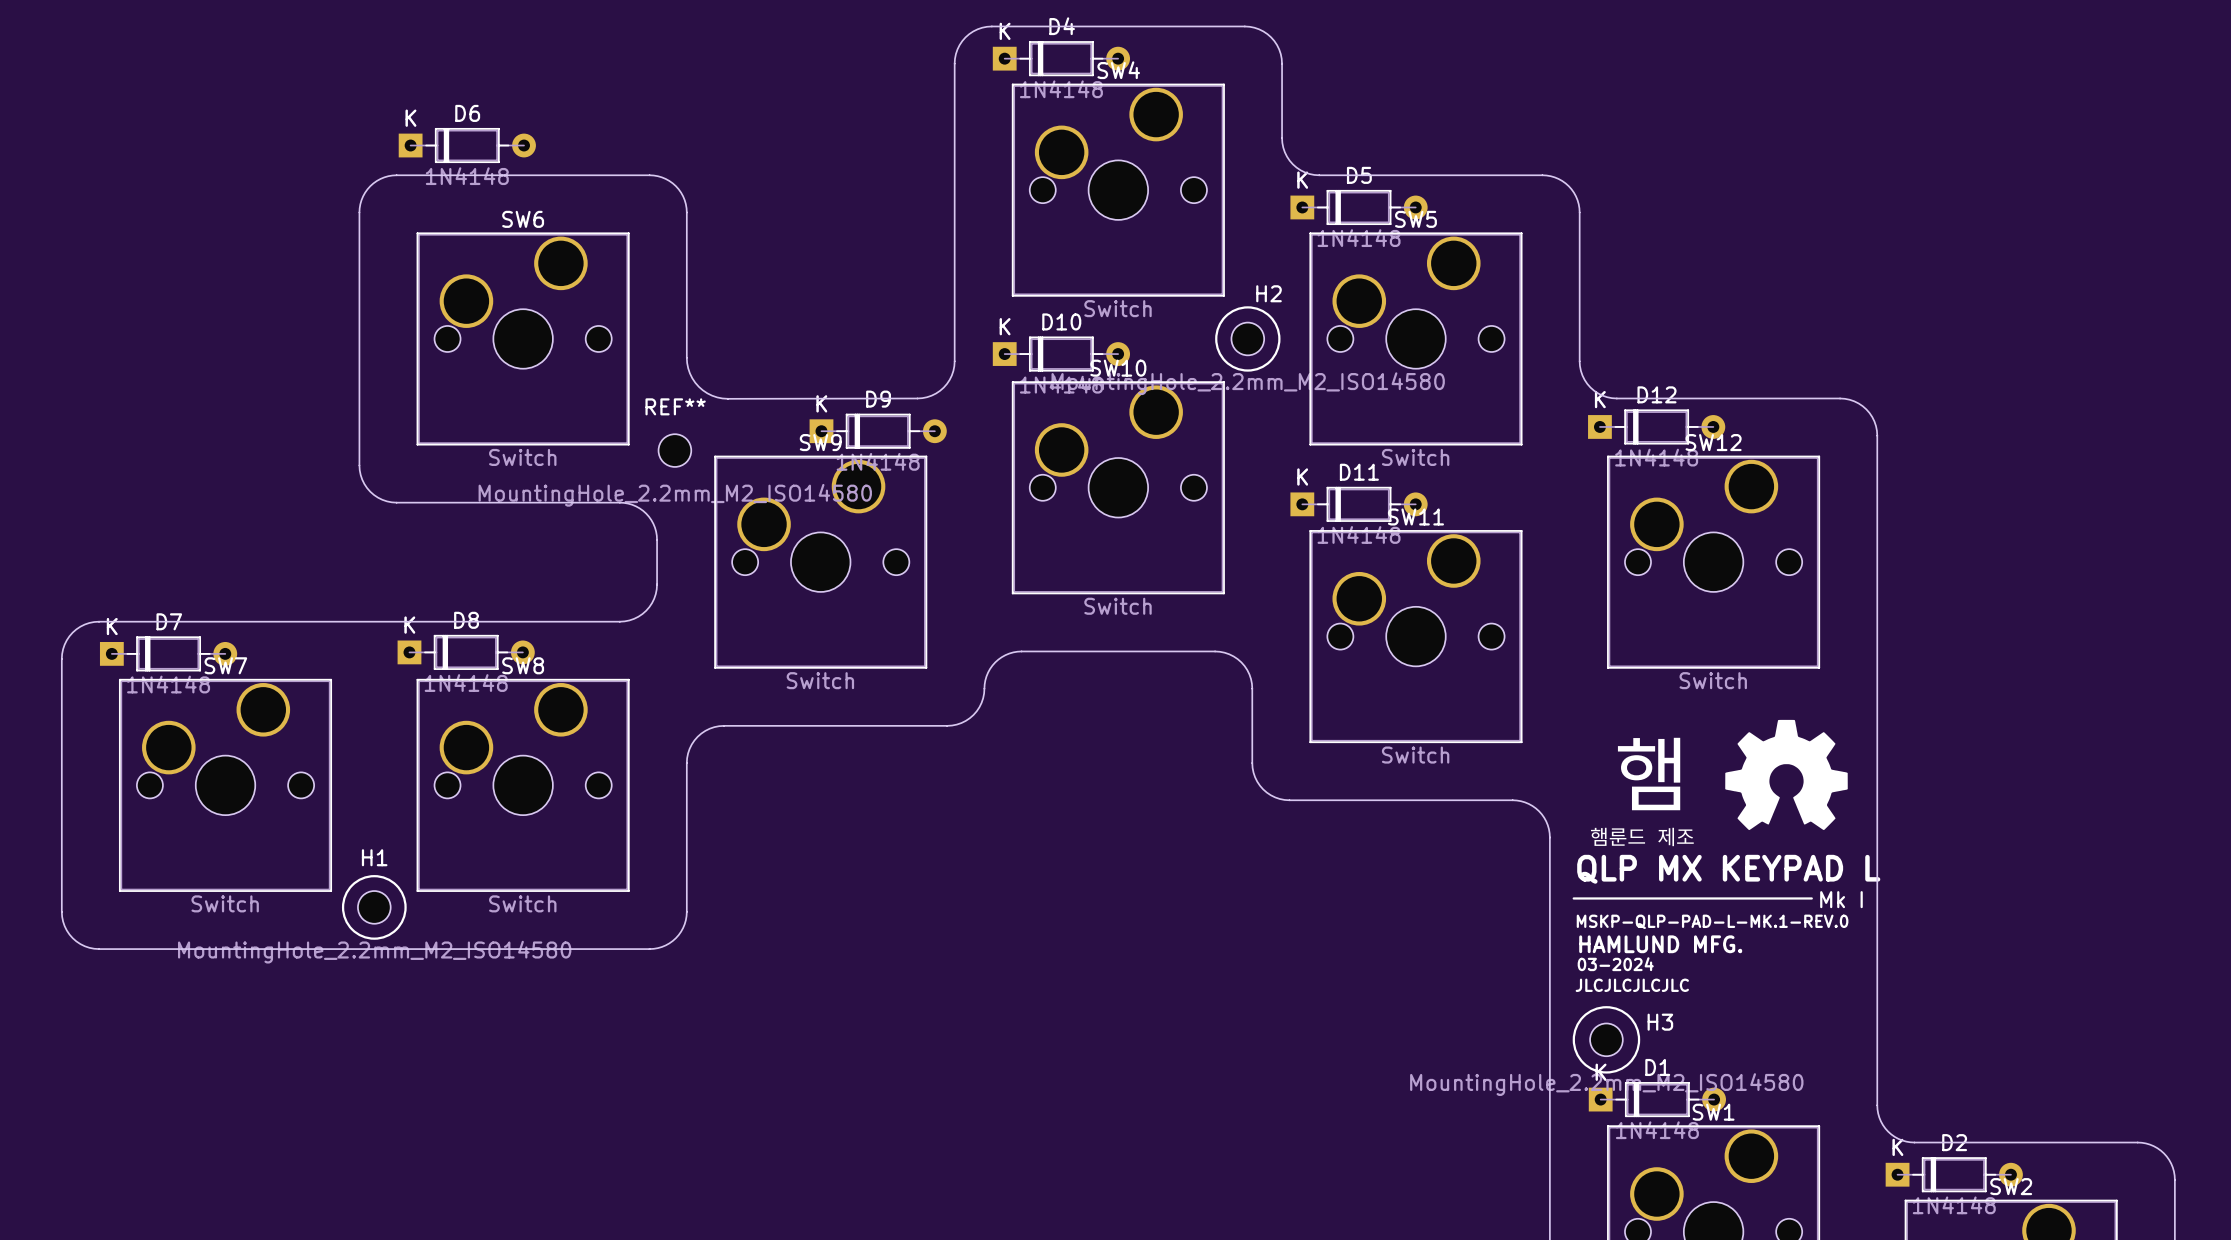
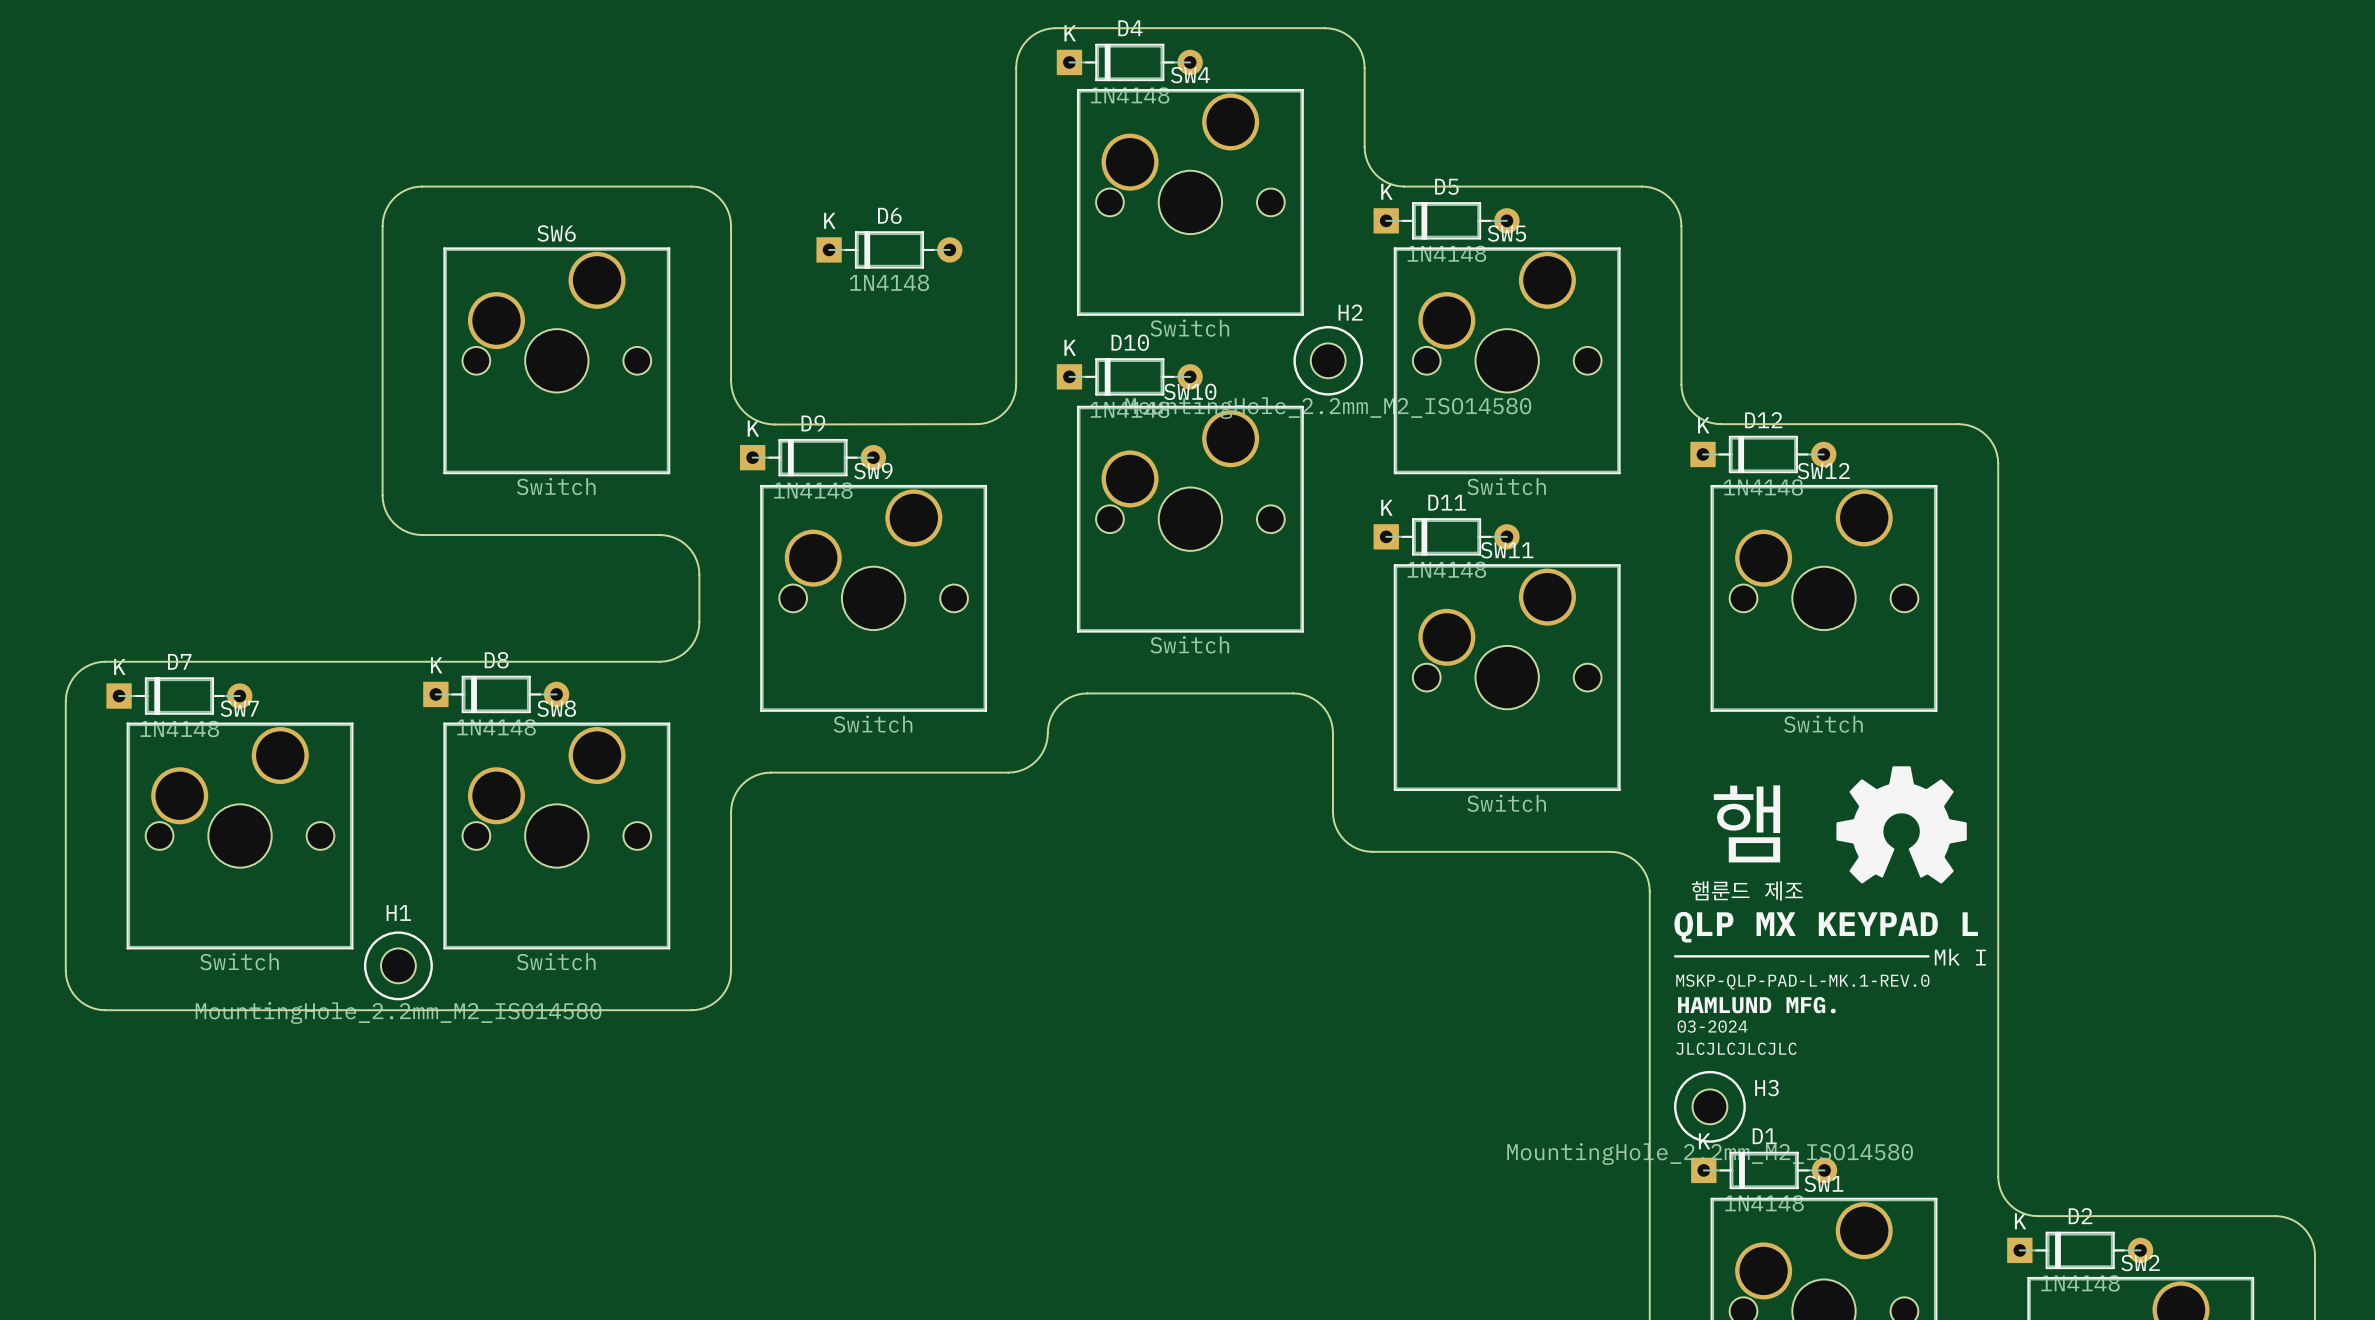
D6 position: (467, 145) -> (889, 249)
D9 position: (878, 431) -> (813, 457)
REF**: MountingHole_2.2mm_M2_ISO14580 (674, 450) -> none

